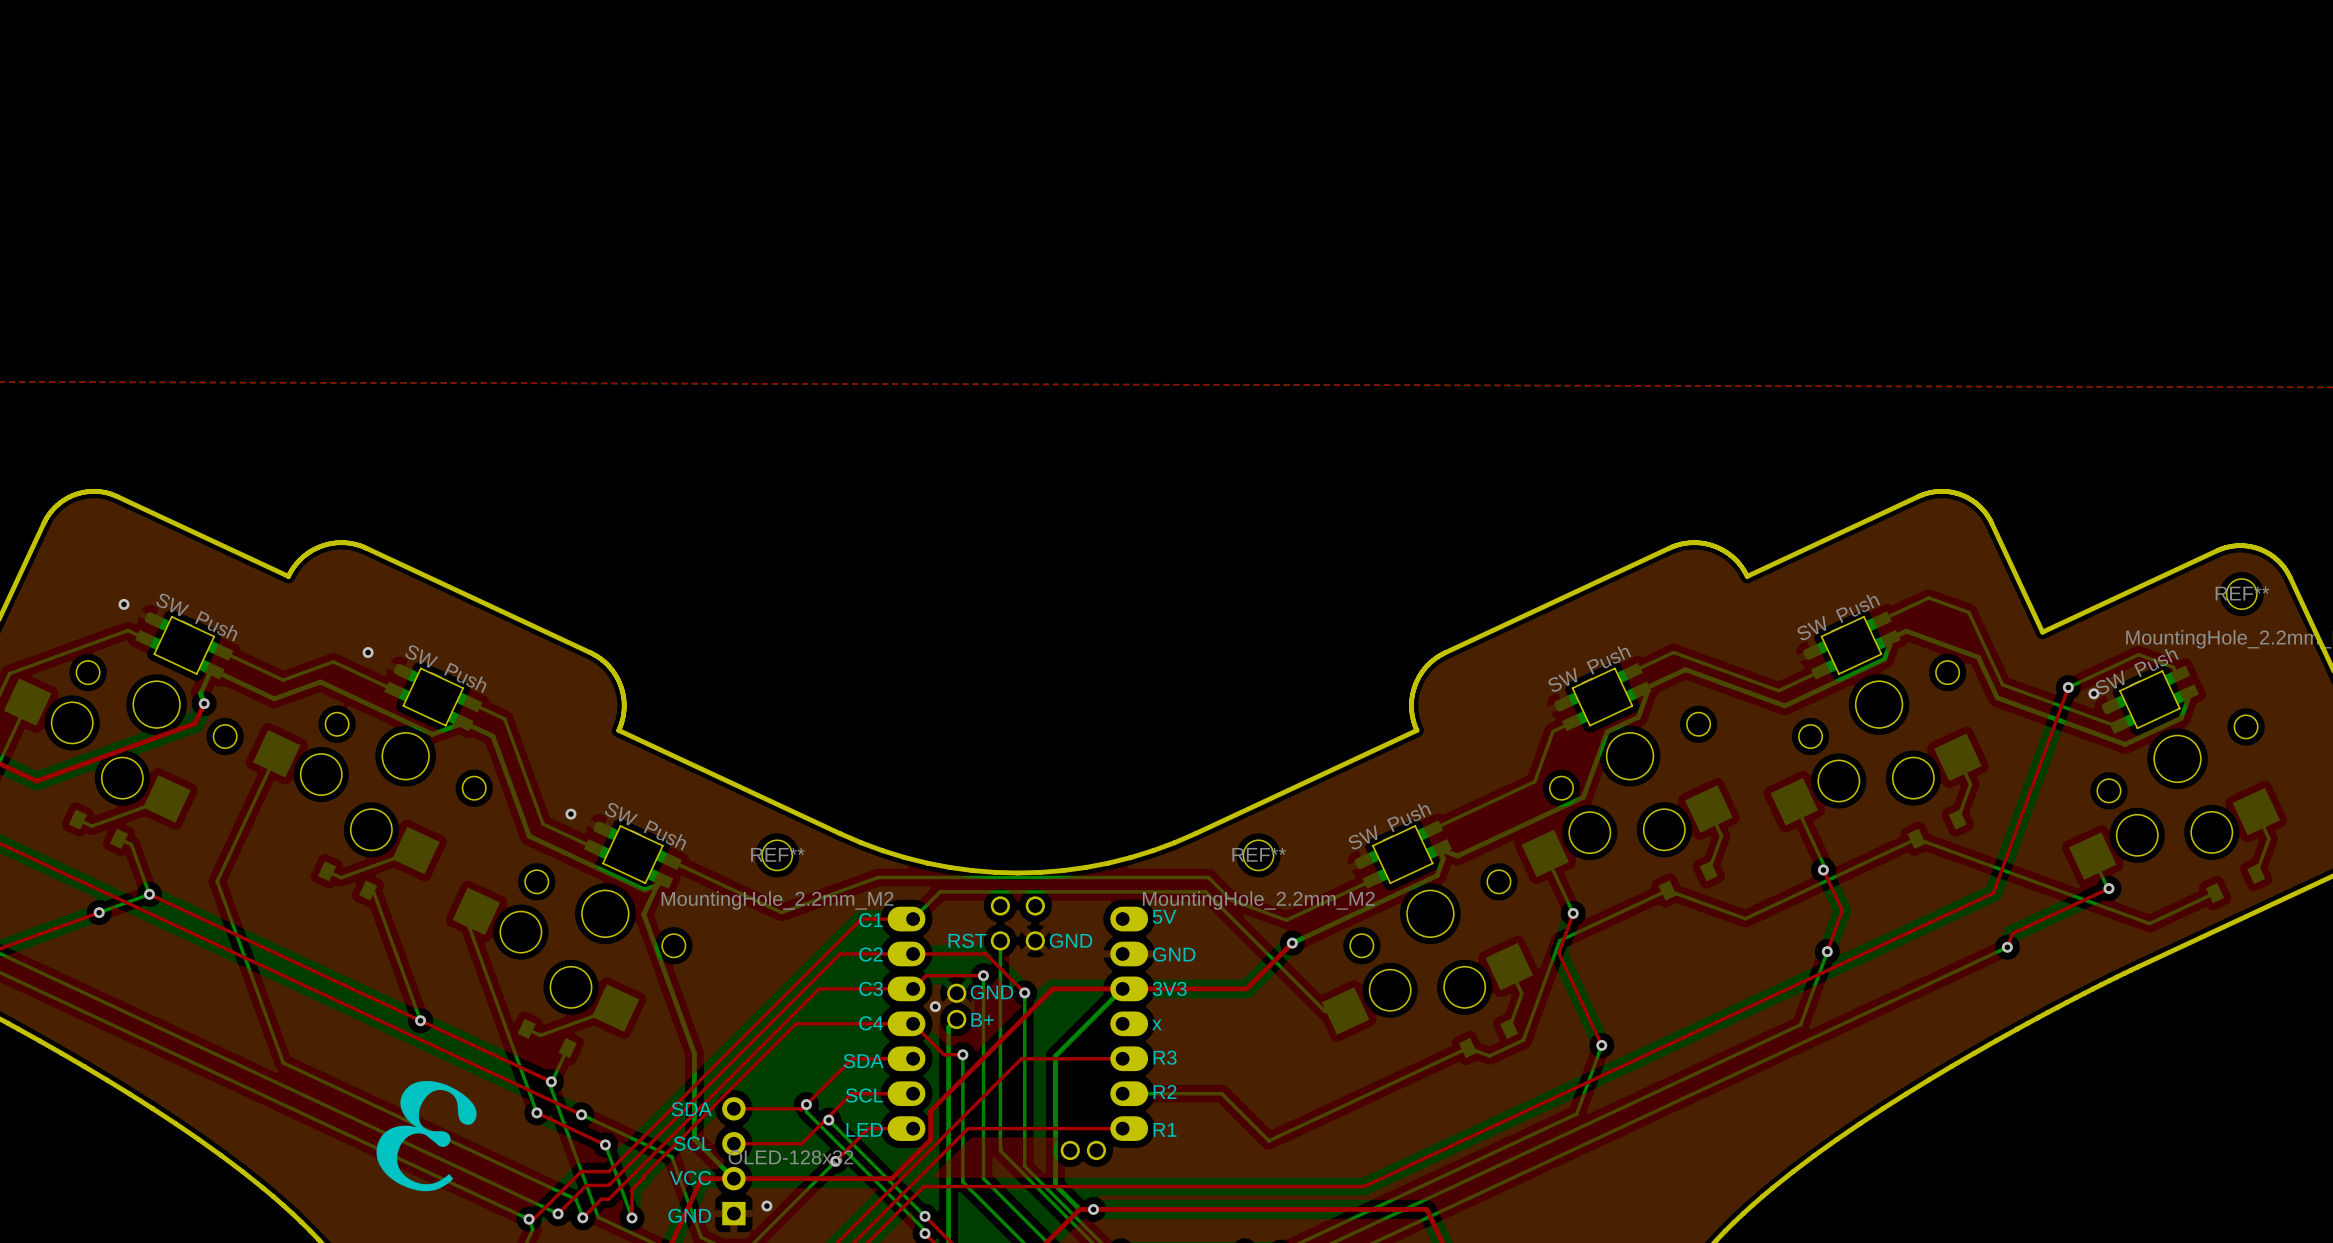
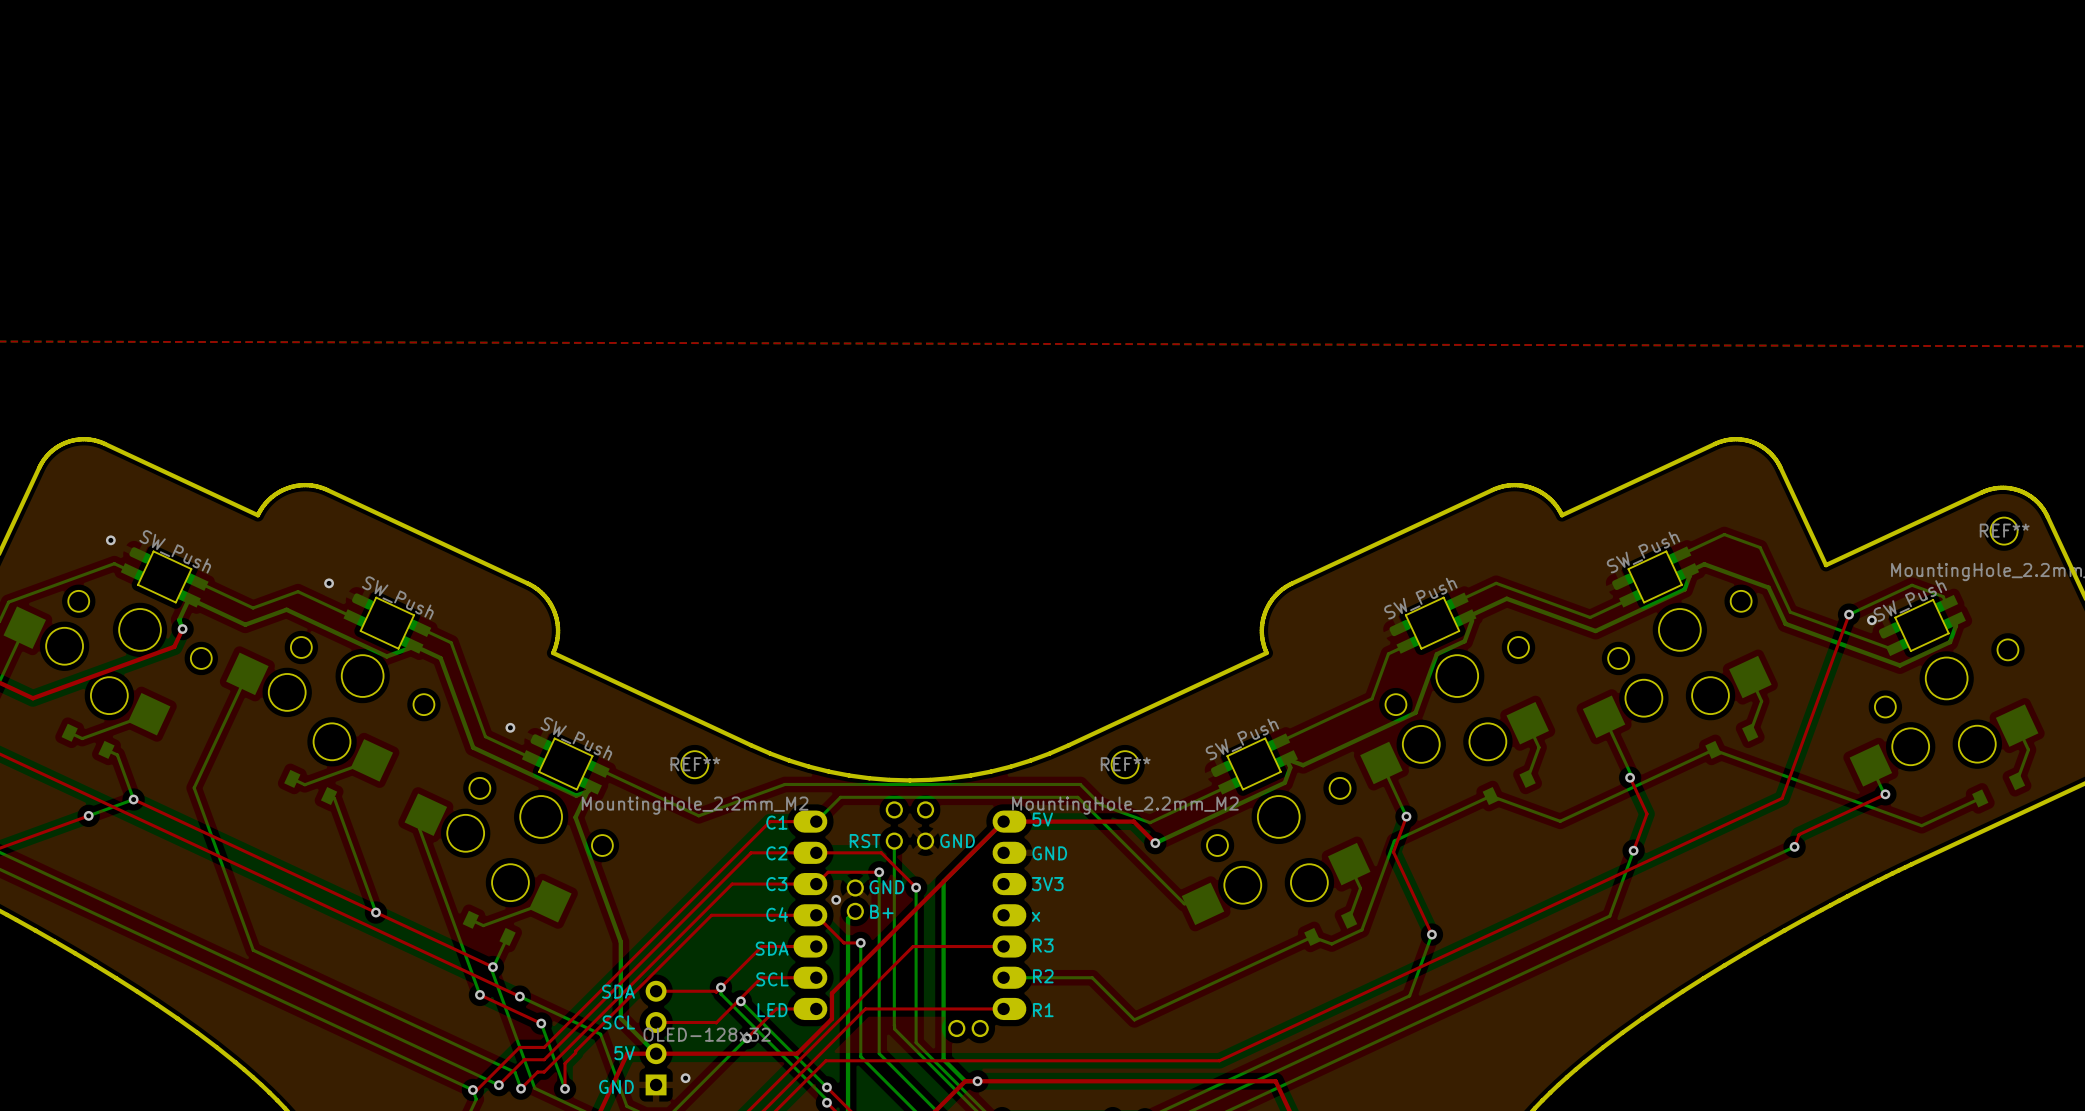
top track: (1292, 943) (1246, 988) (1052, 988) -> (1155, 843) (1133, 821) (1003, 821) (941, 884)
bottom track: (1122, 988) (1055, 1056) -> (1003, 821) (943, 881) (943, 944)
drawing: [376, 1080, 477, 1192] -> none
text: VCC (690, 1178) -> 5V (624, 1053)

